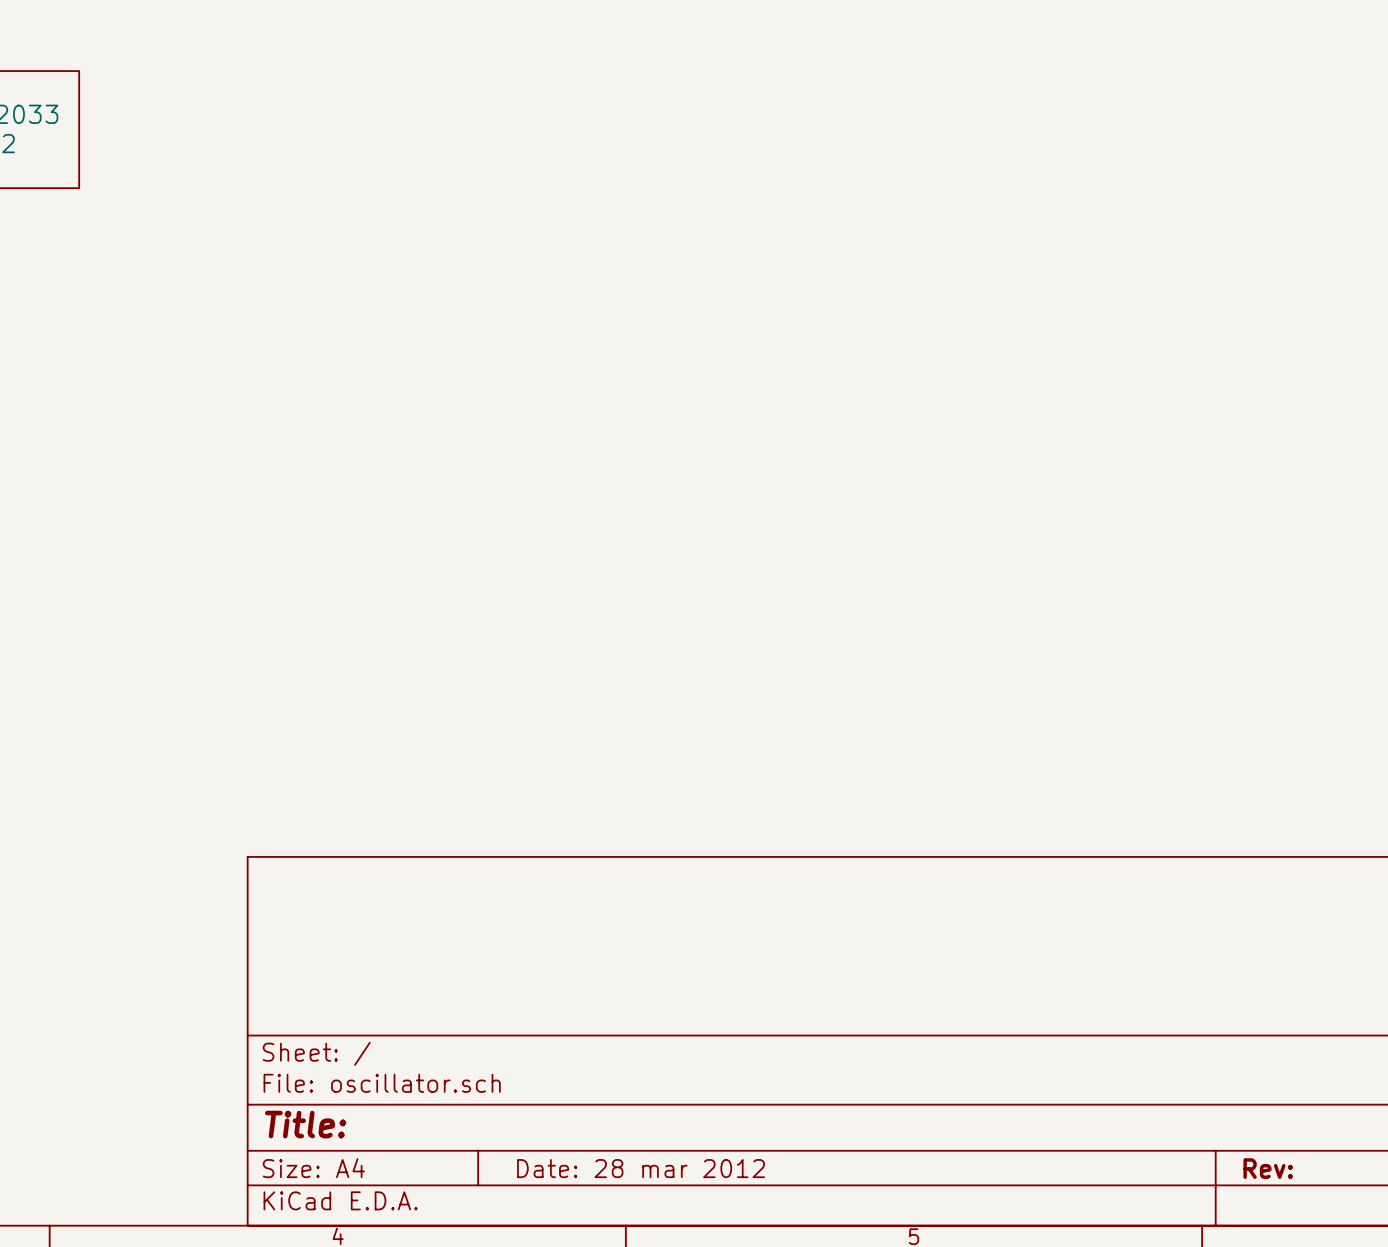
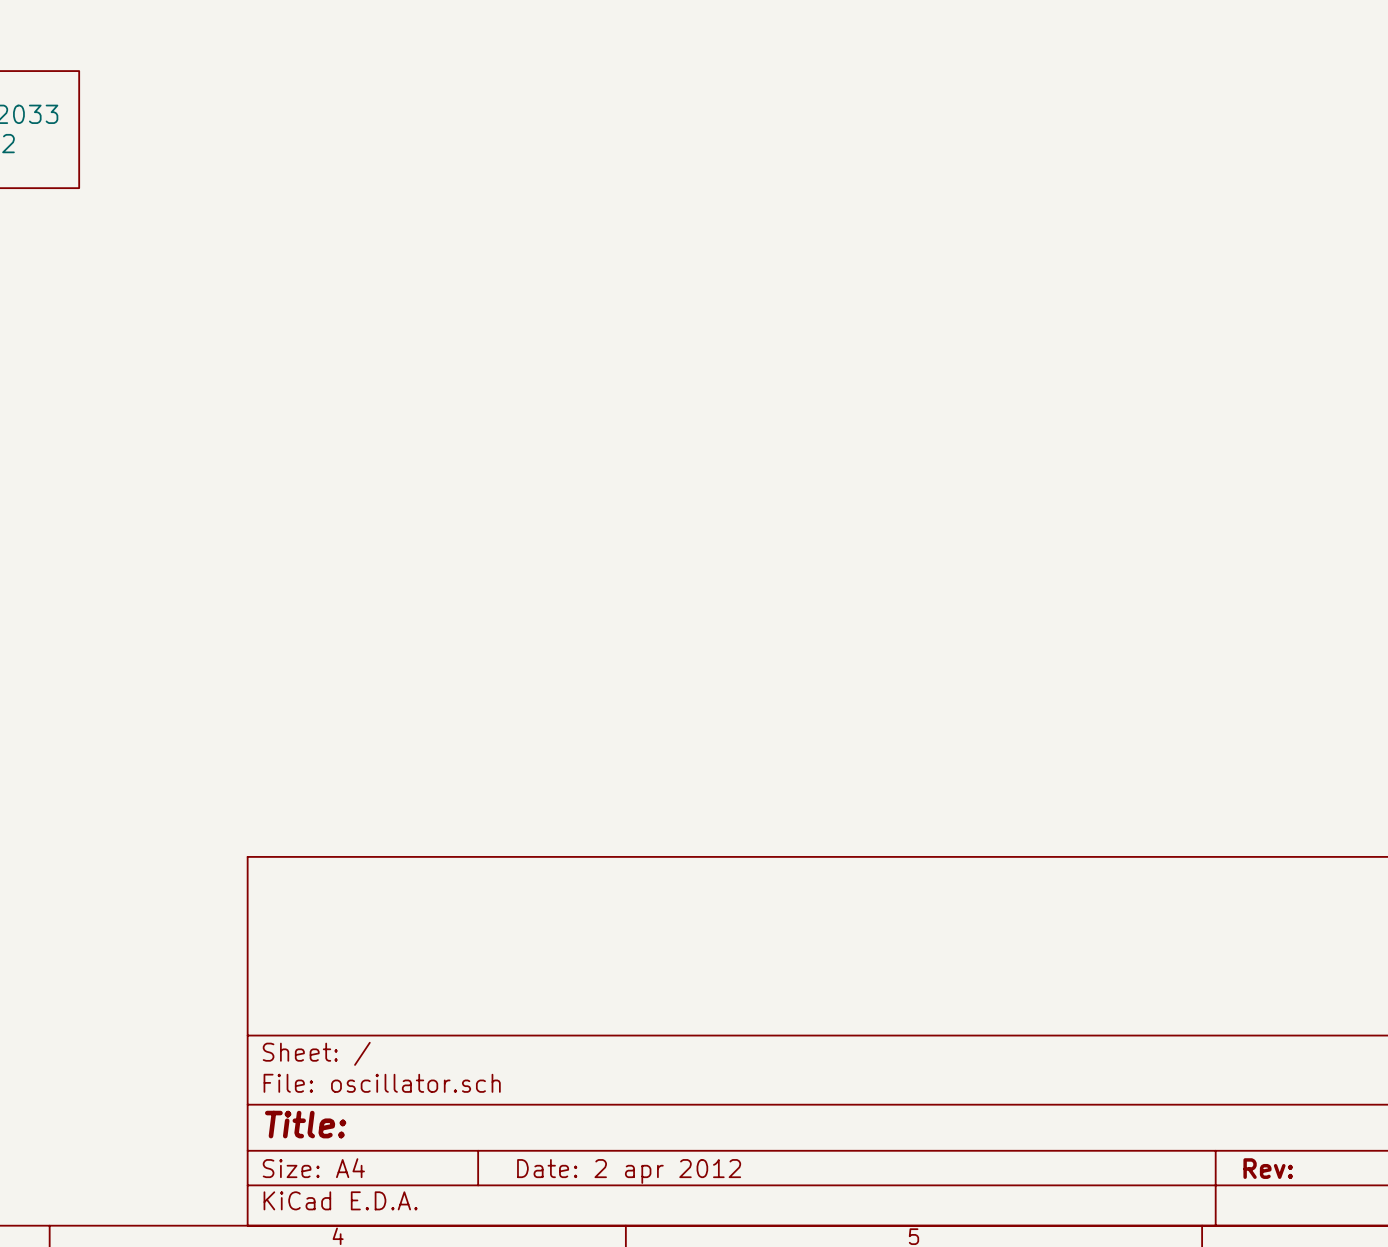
title block: Date: 28 mar 2012 (641, 1168) -> Date: 2 apr 2012 (629, 1171)

